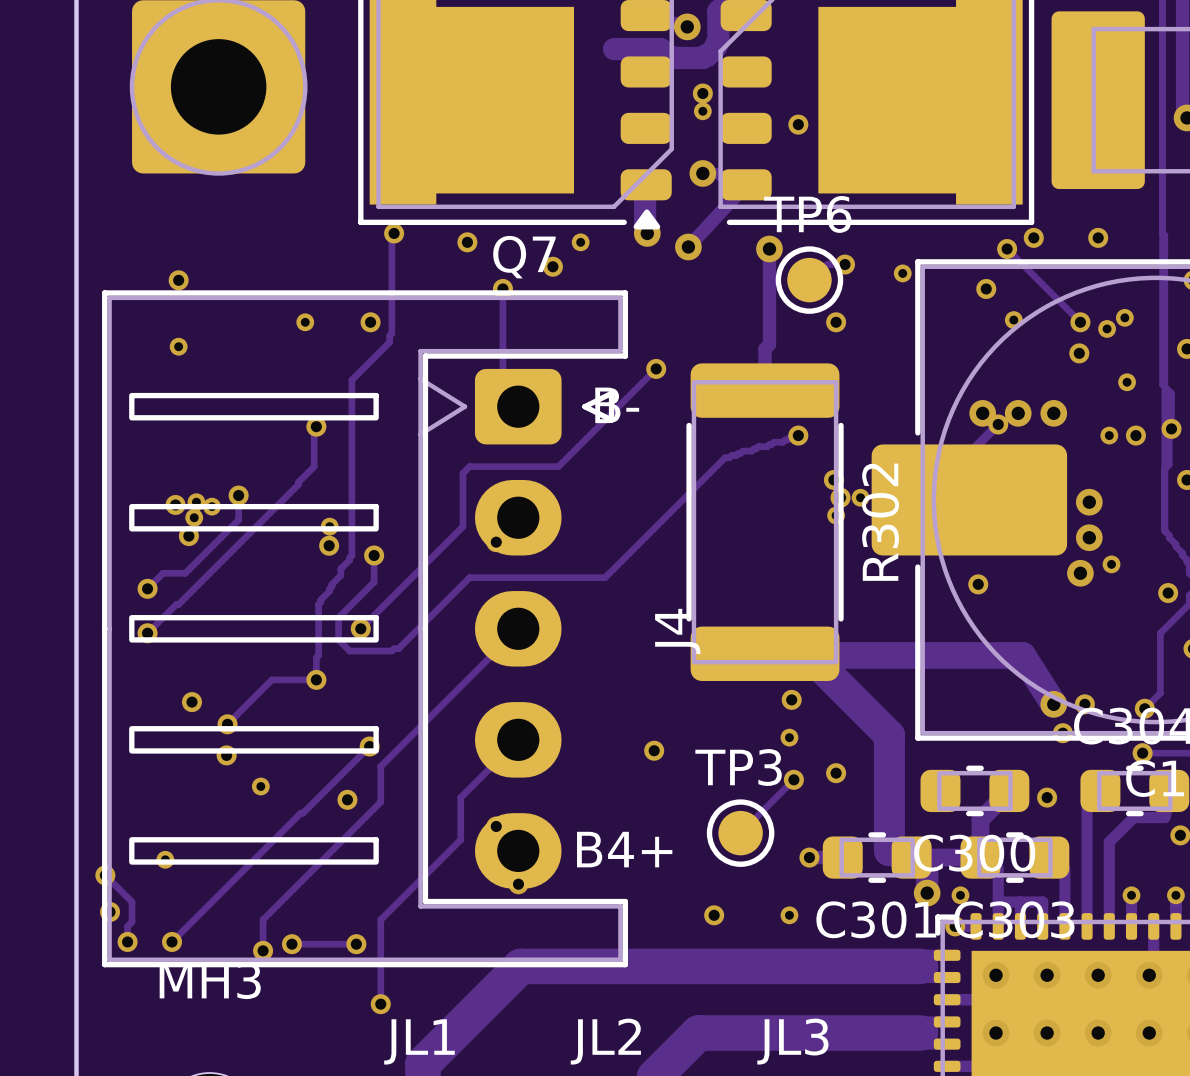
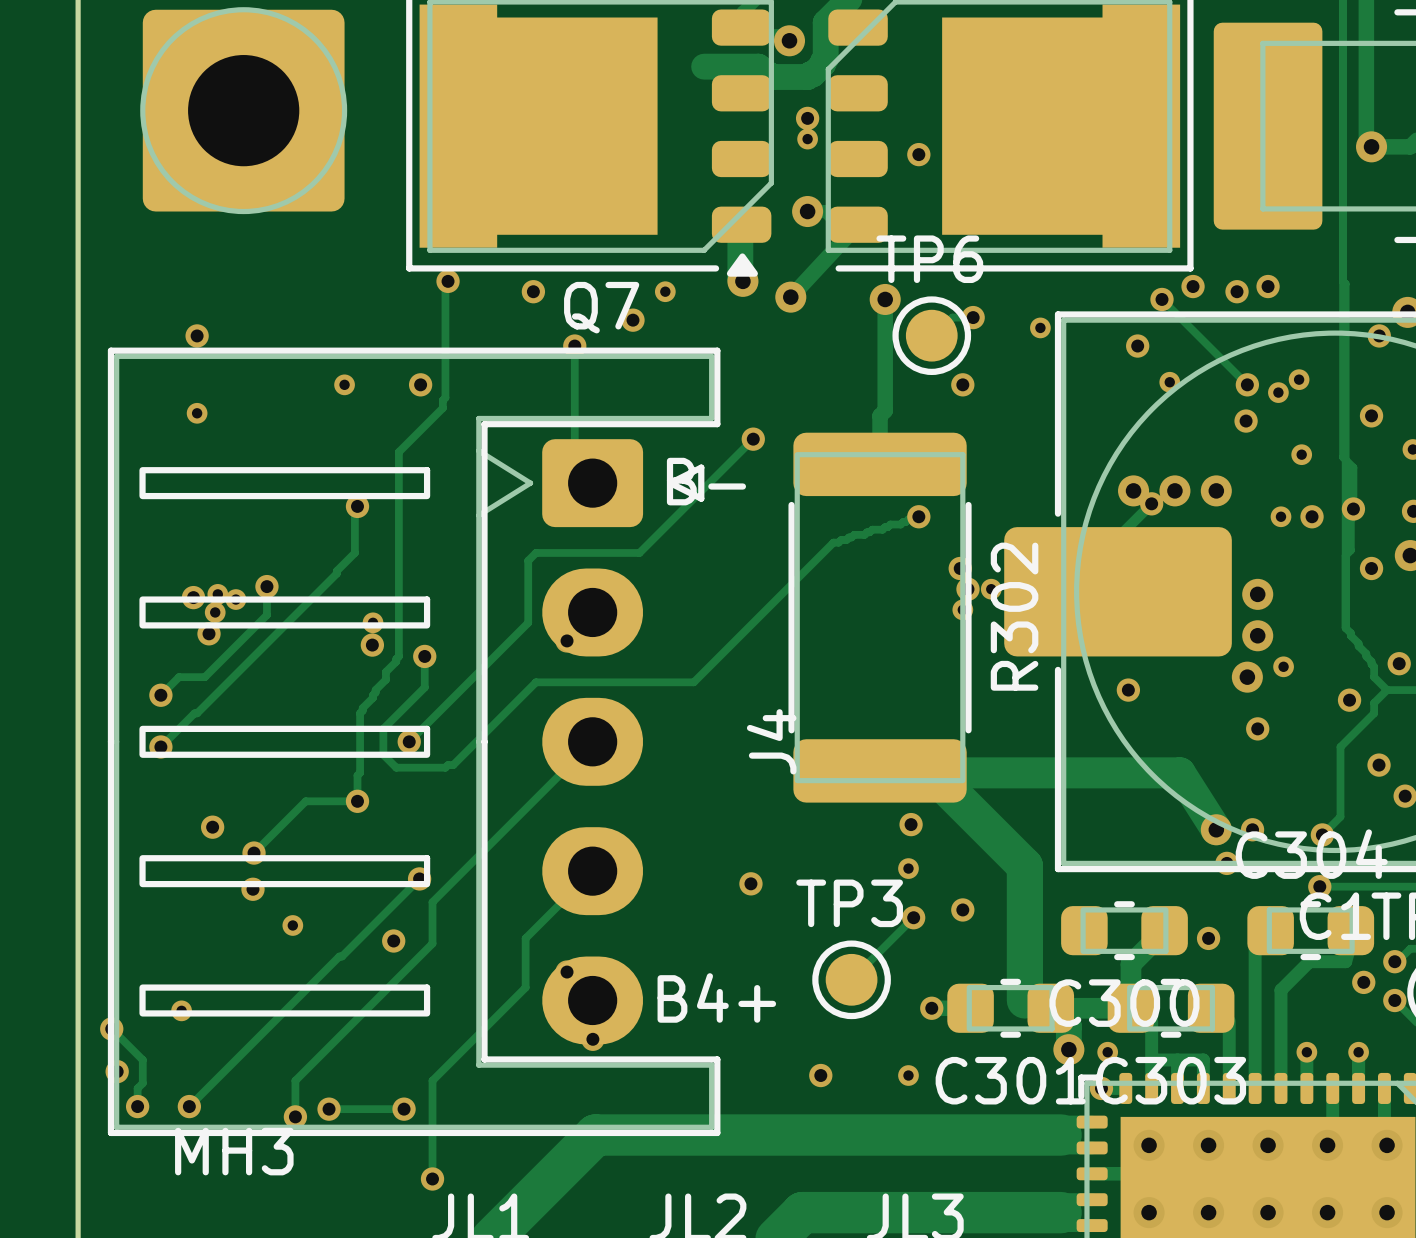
via: none -> (1237, 291)
via: none -> (1257, 728)

